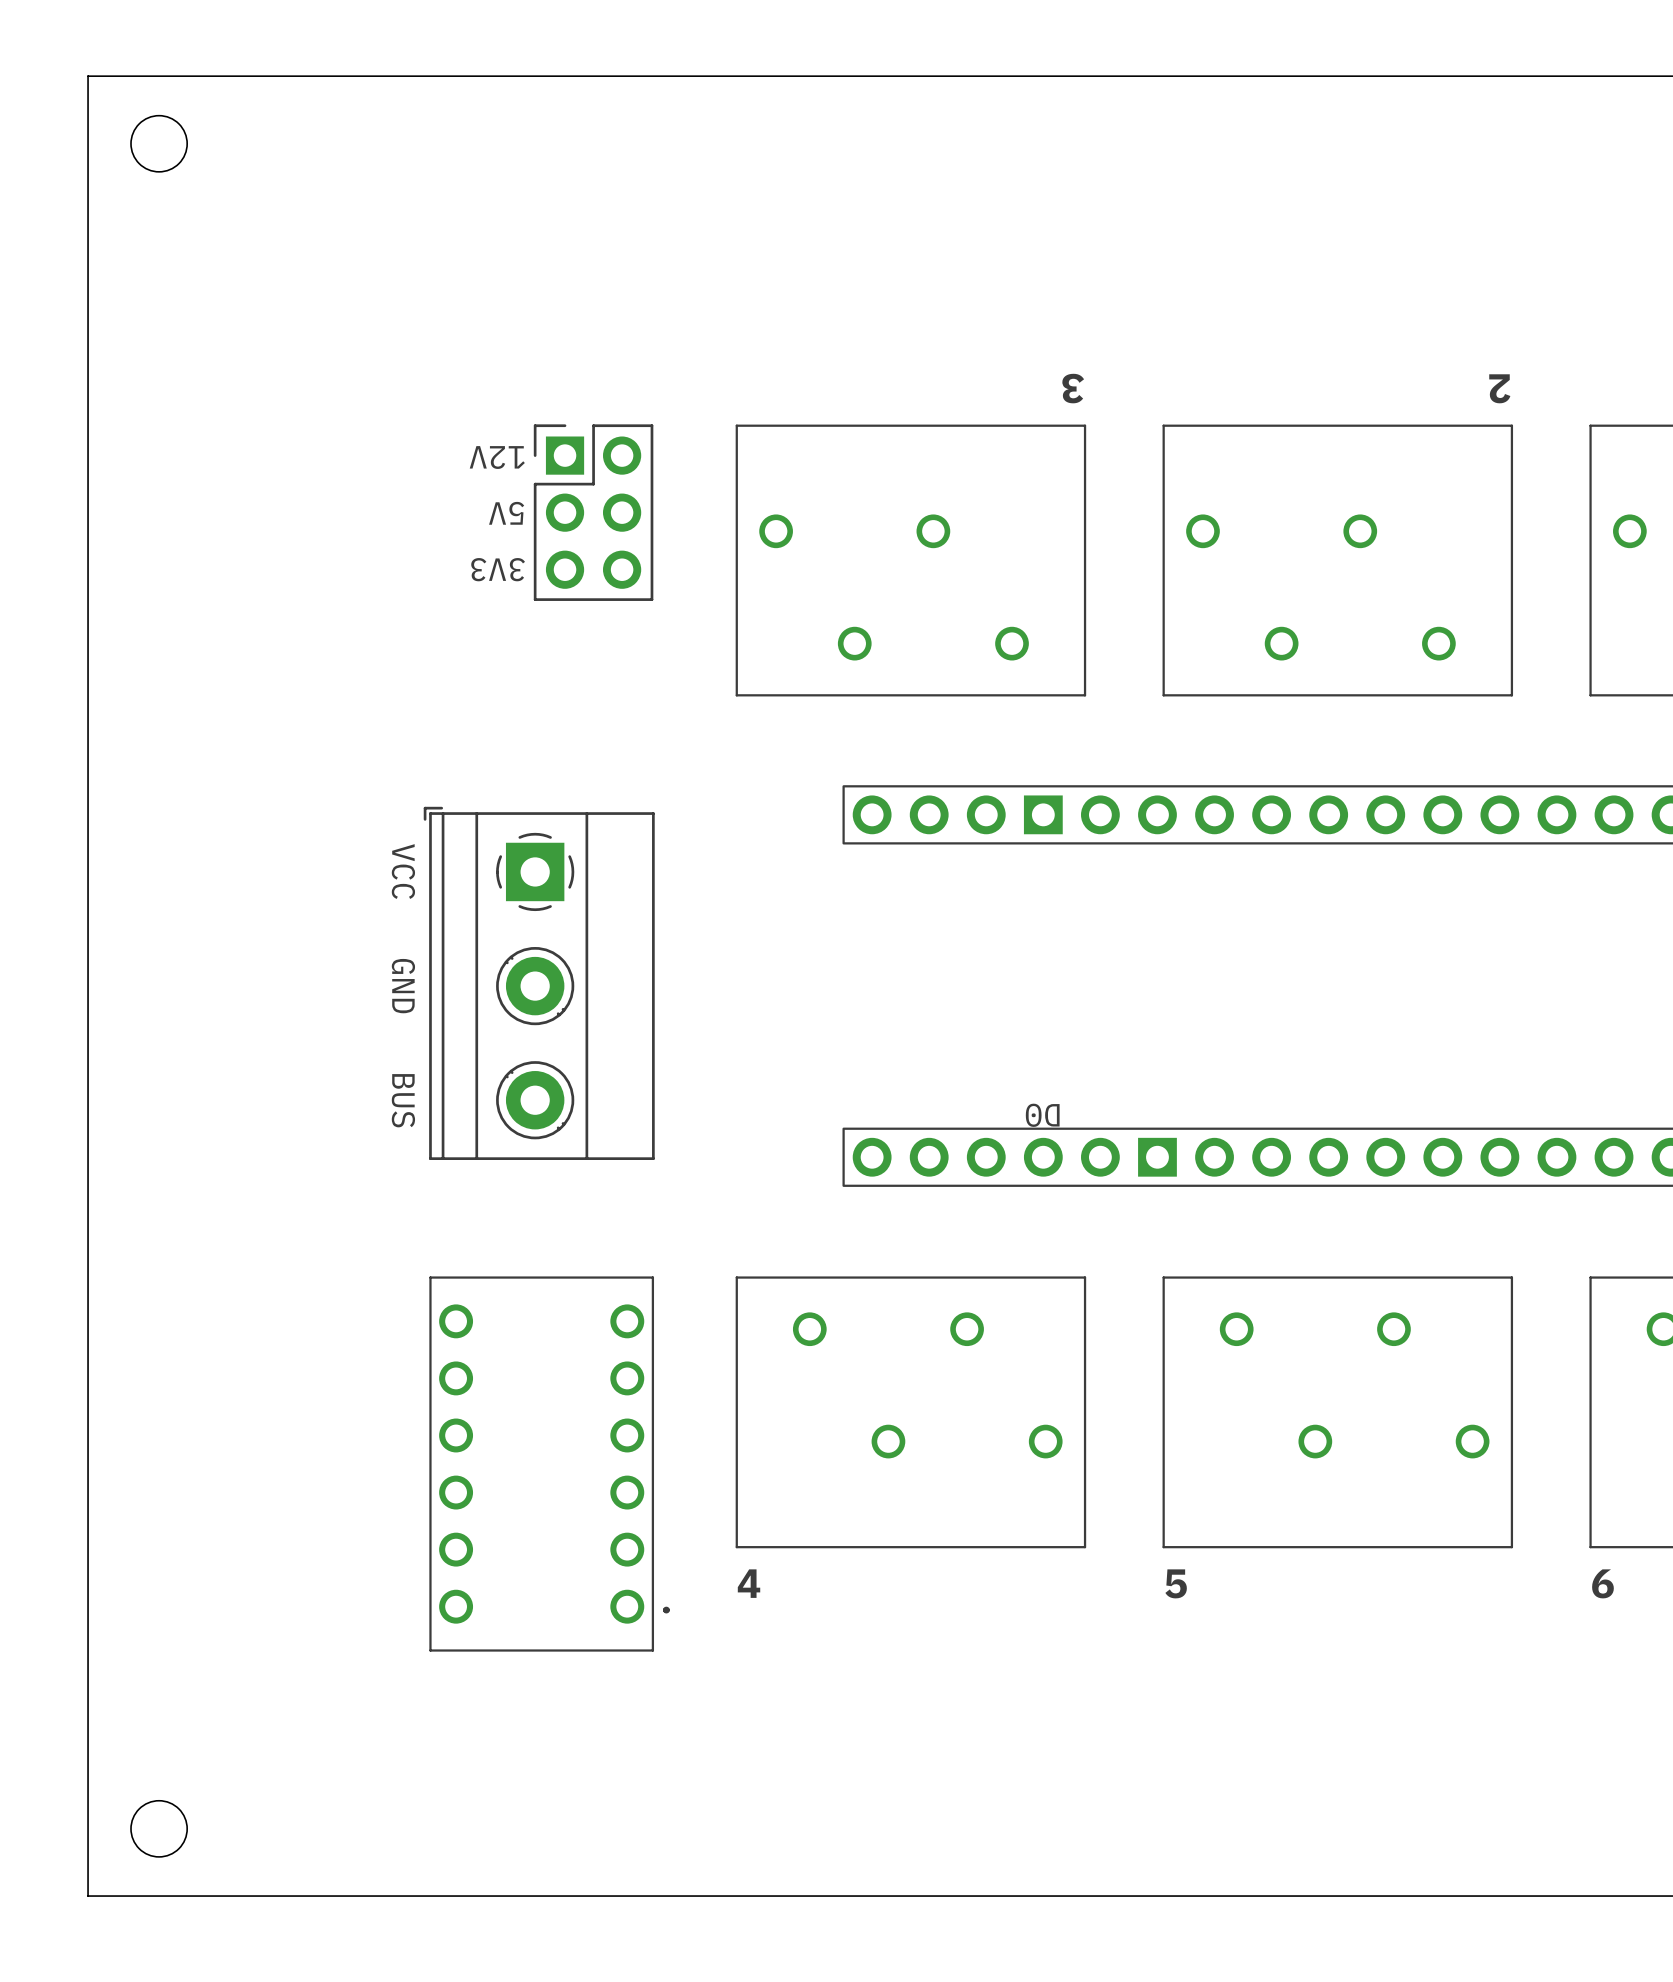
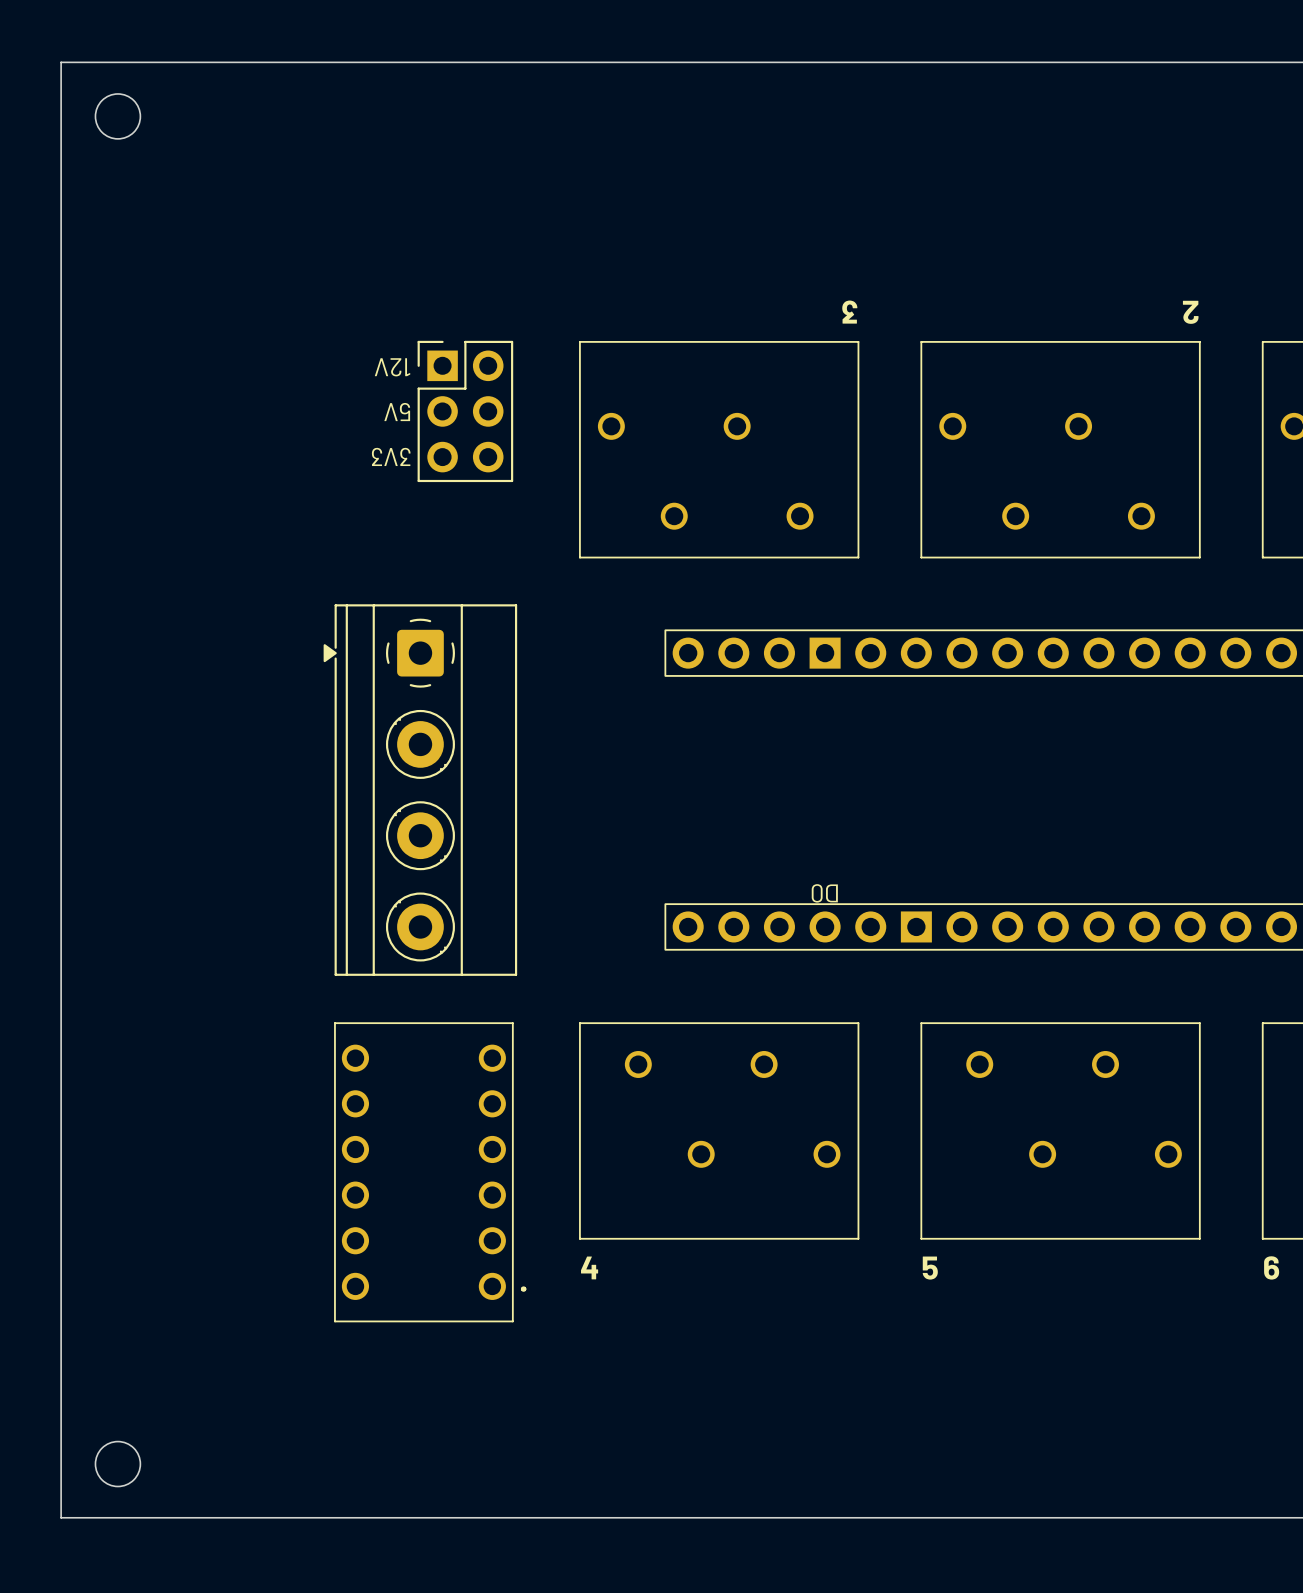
part footprint: [423, 806, 655, 1160] -> [323, 604, 518, 976]
text: VCC (403, 871) -> none
text: GND (403, 986) -> none
text: BUS (403, 1100) -> none

